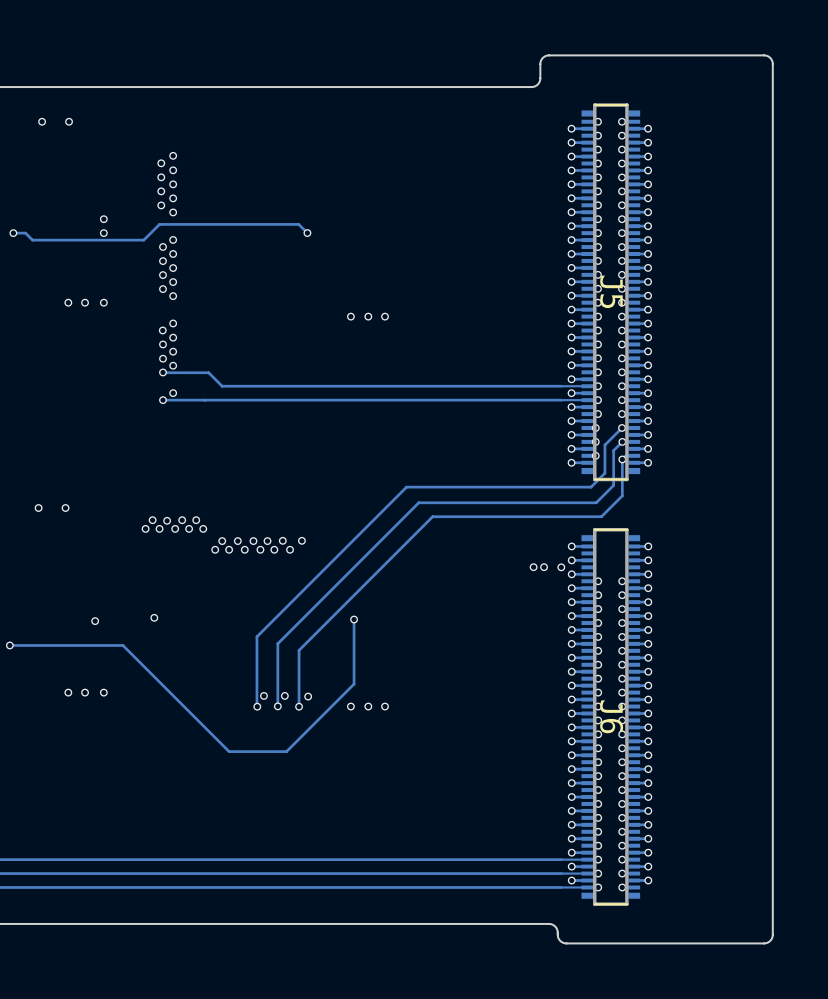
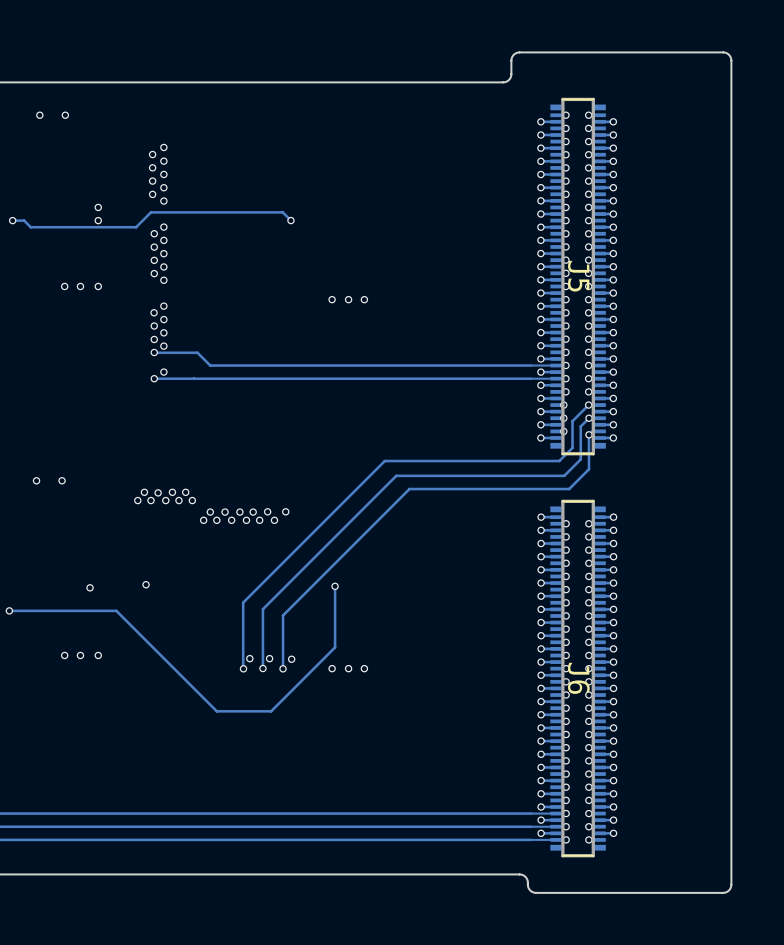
via: none -> (566, 523)
via: none -> (588, 523)
via: (533, 567) -> none
via: (544, 567) -> none
via: (561, 567) -> none
via: none -> (566, 536)
via: none -> (588, 536)

